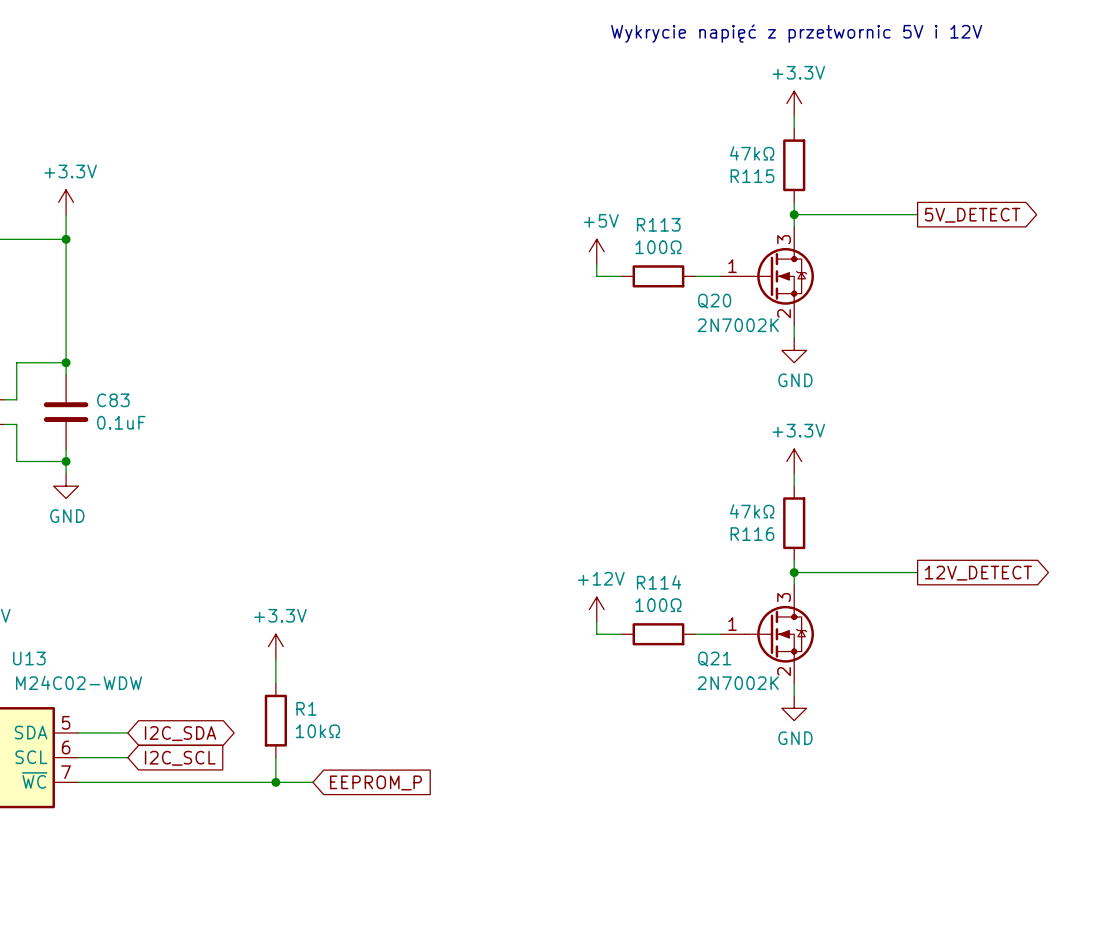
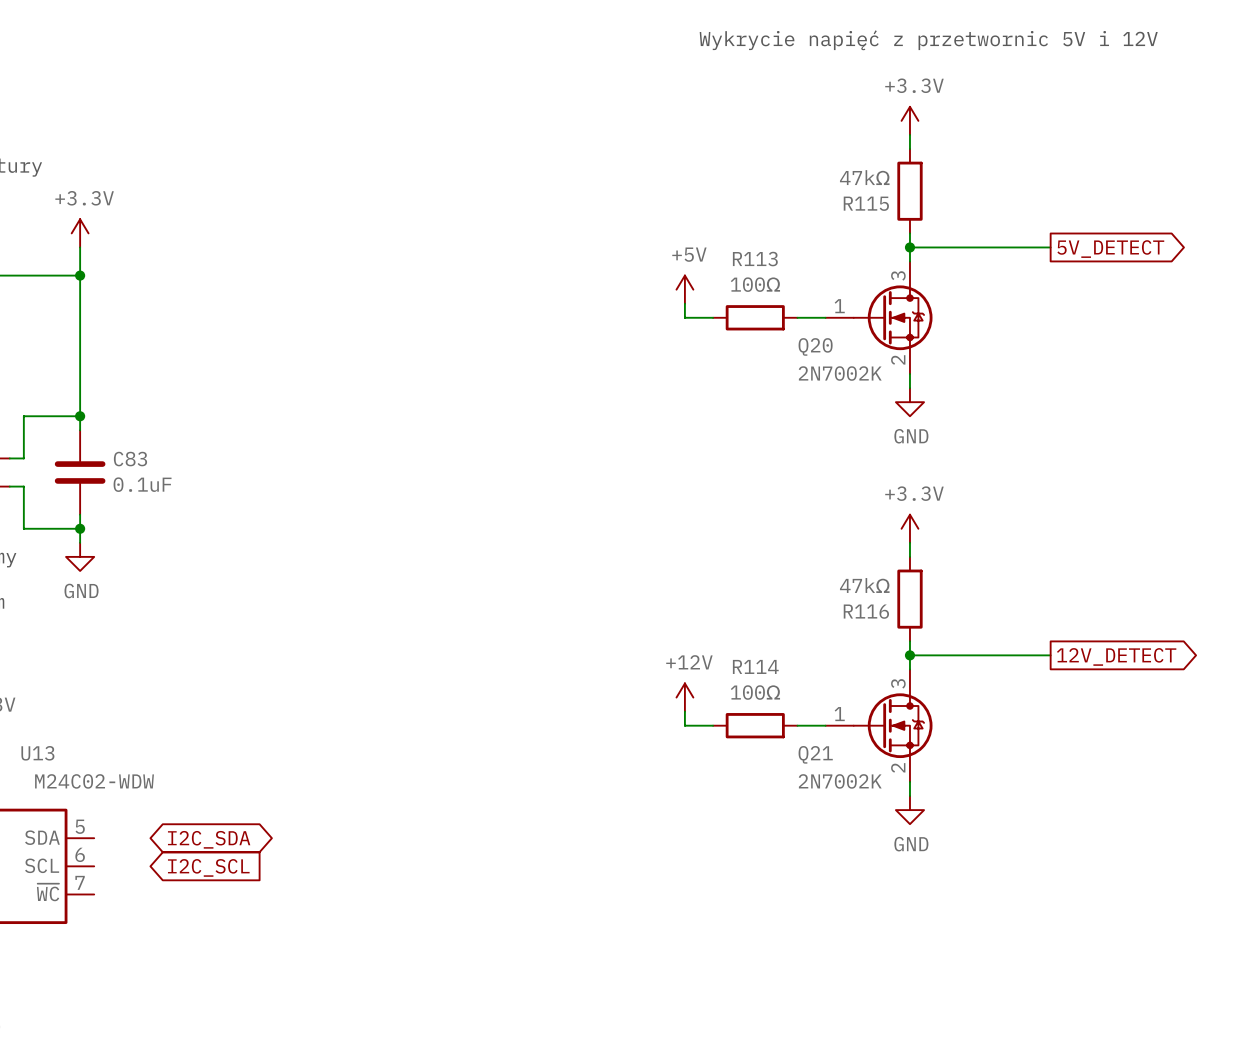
power symbol: +3.3V (275, 646) -> none
wire: (275, 658) (275, 683) -> none
R1: 10kΩ (275, 720) -> none
wire: (78, 732) (127, 732) -> none
wire: (78, 757) (127, 757) -> none
wire: (275, 757) (275, 782) -> none
wire: (78, 782) (312, 782) -> none
junction: (275, 782) -> none
global label: EEPROM_P (375, 782) -> none

